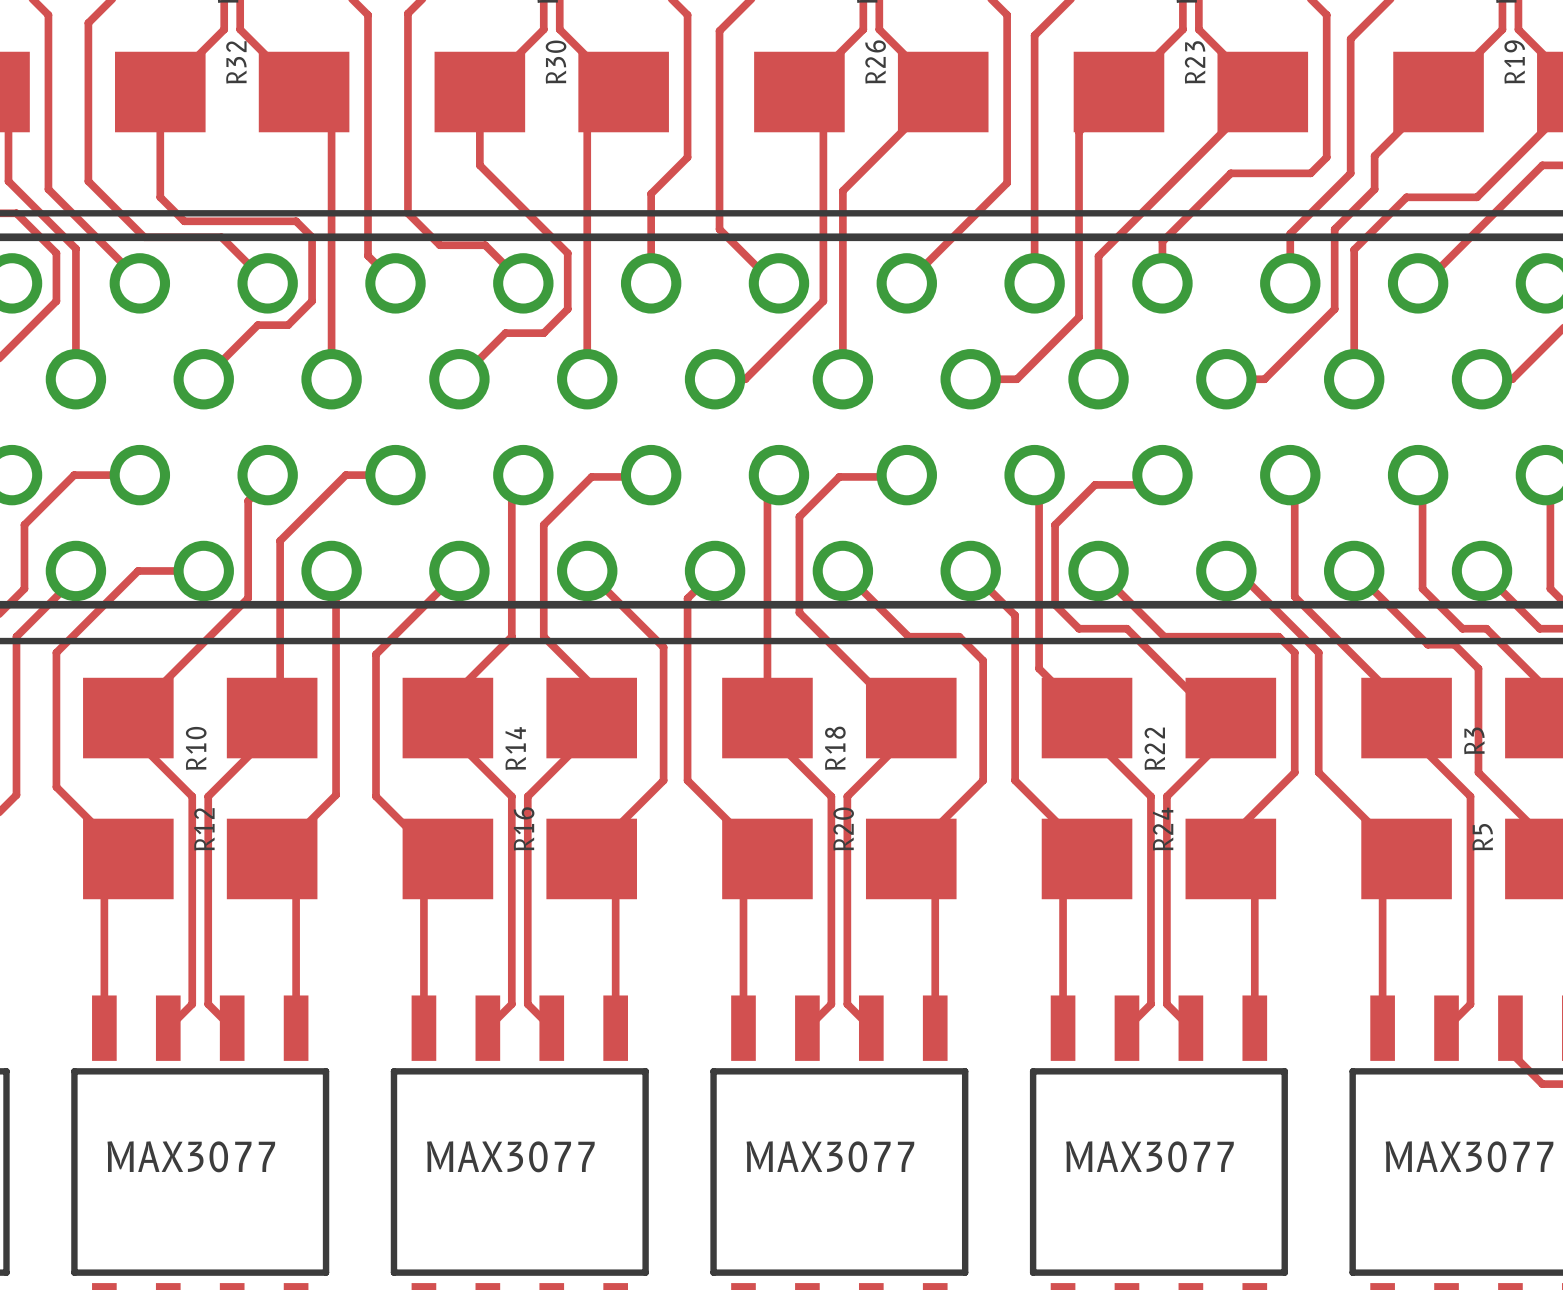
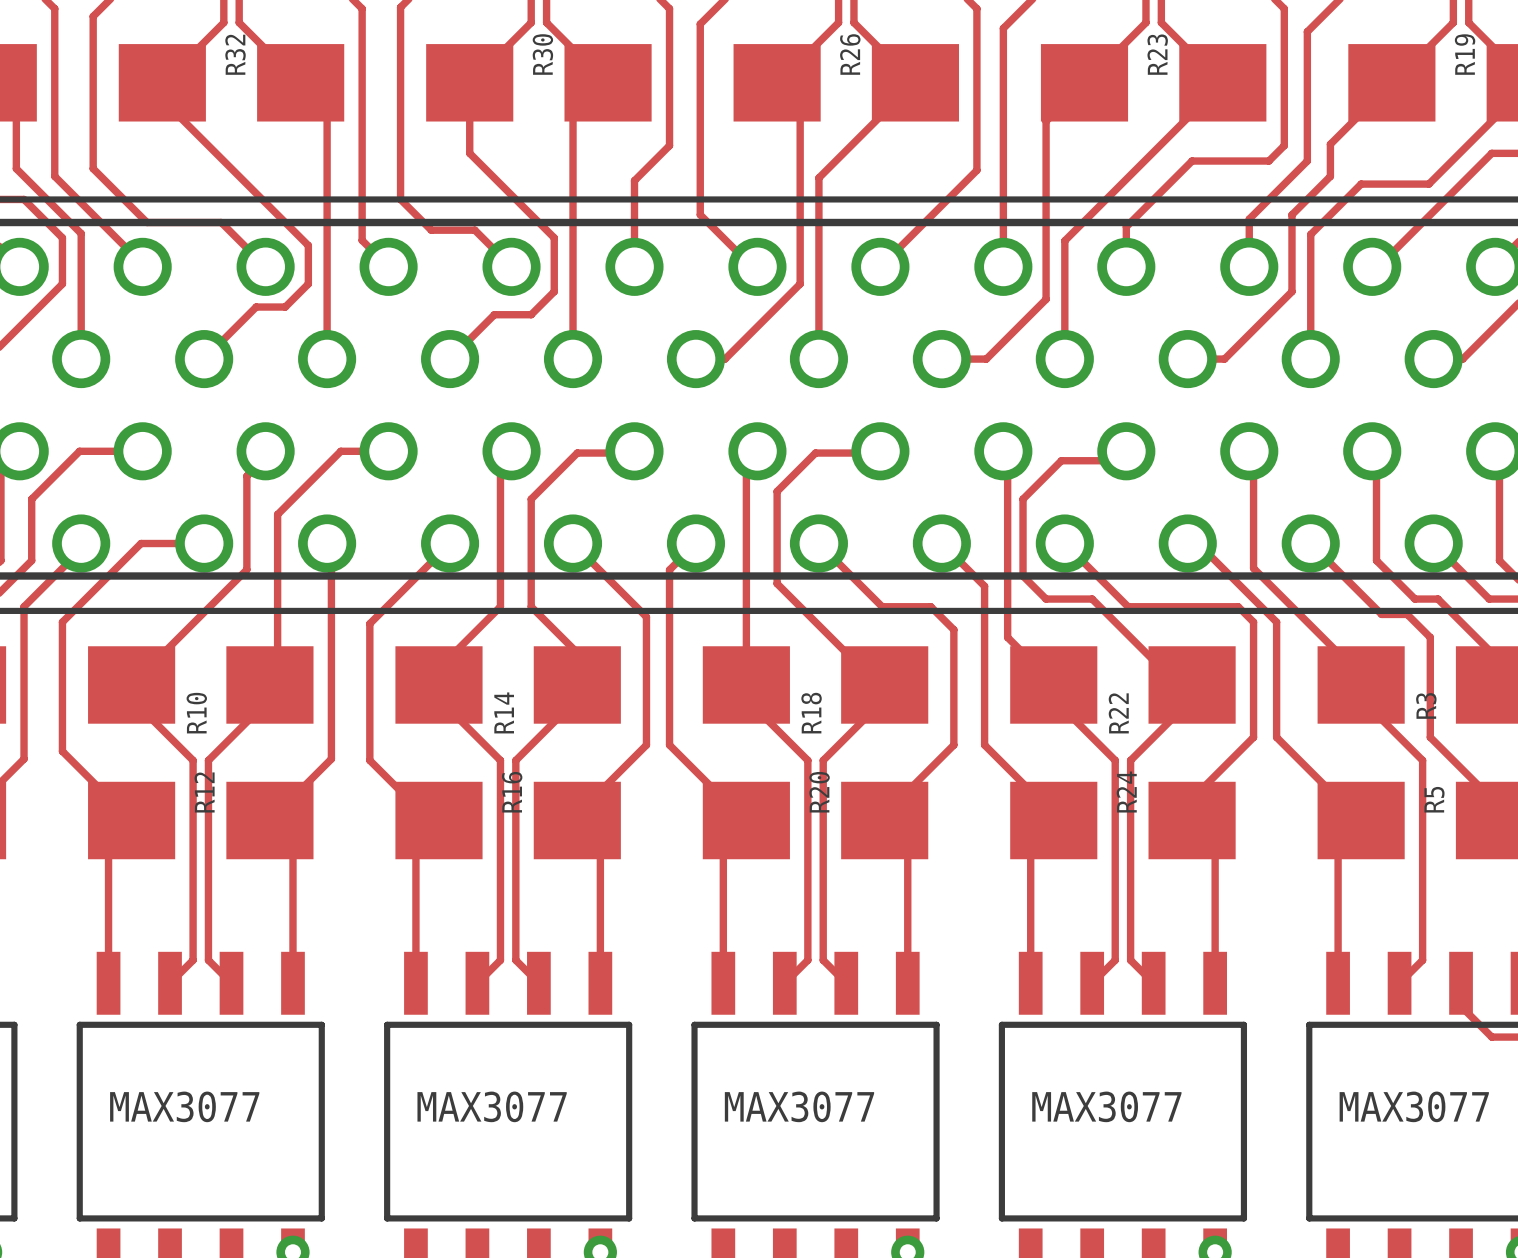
track: (160, 109) (160, 197) (184, 221) (296, 221) (312, 237) (312, 261) -> (162, 99) (308, 245)

